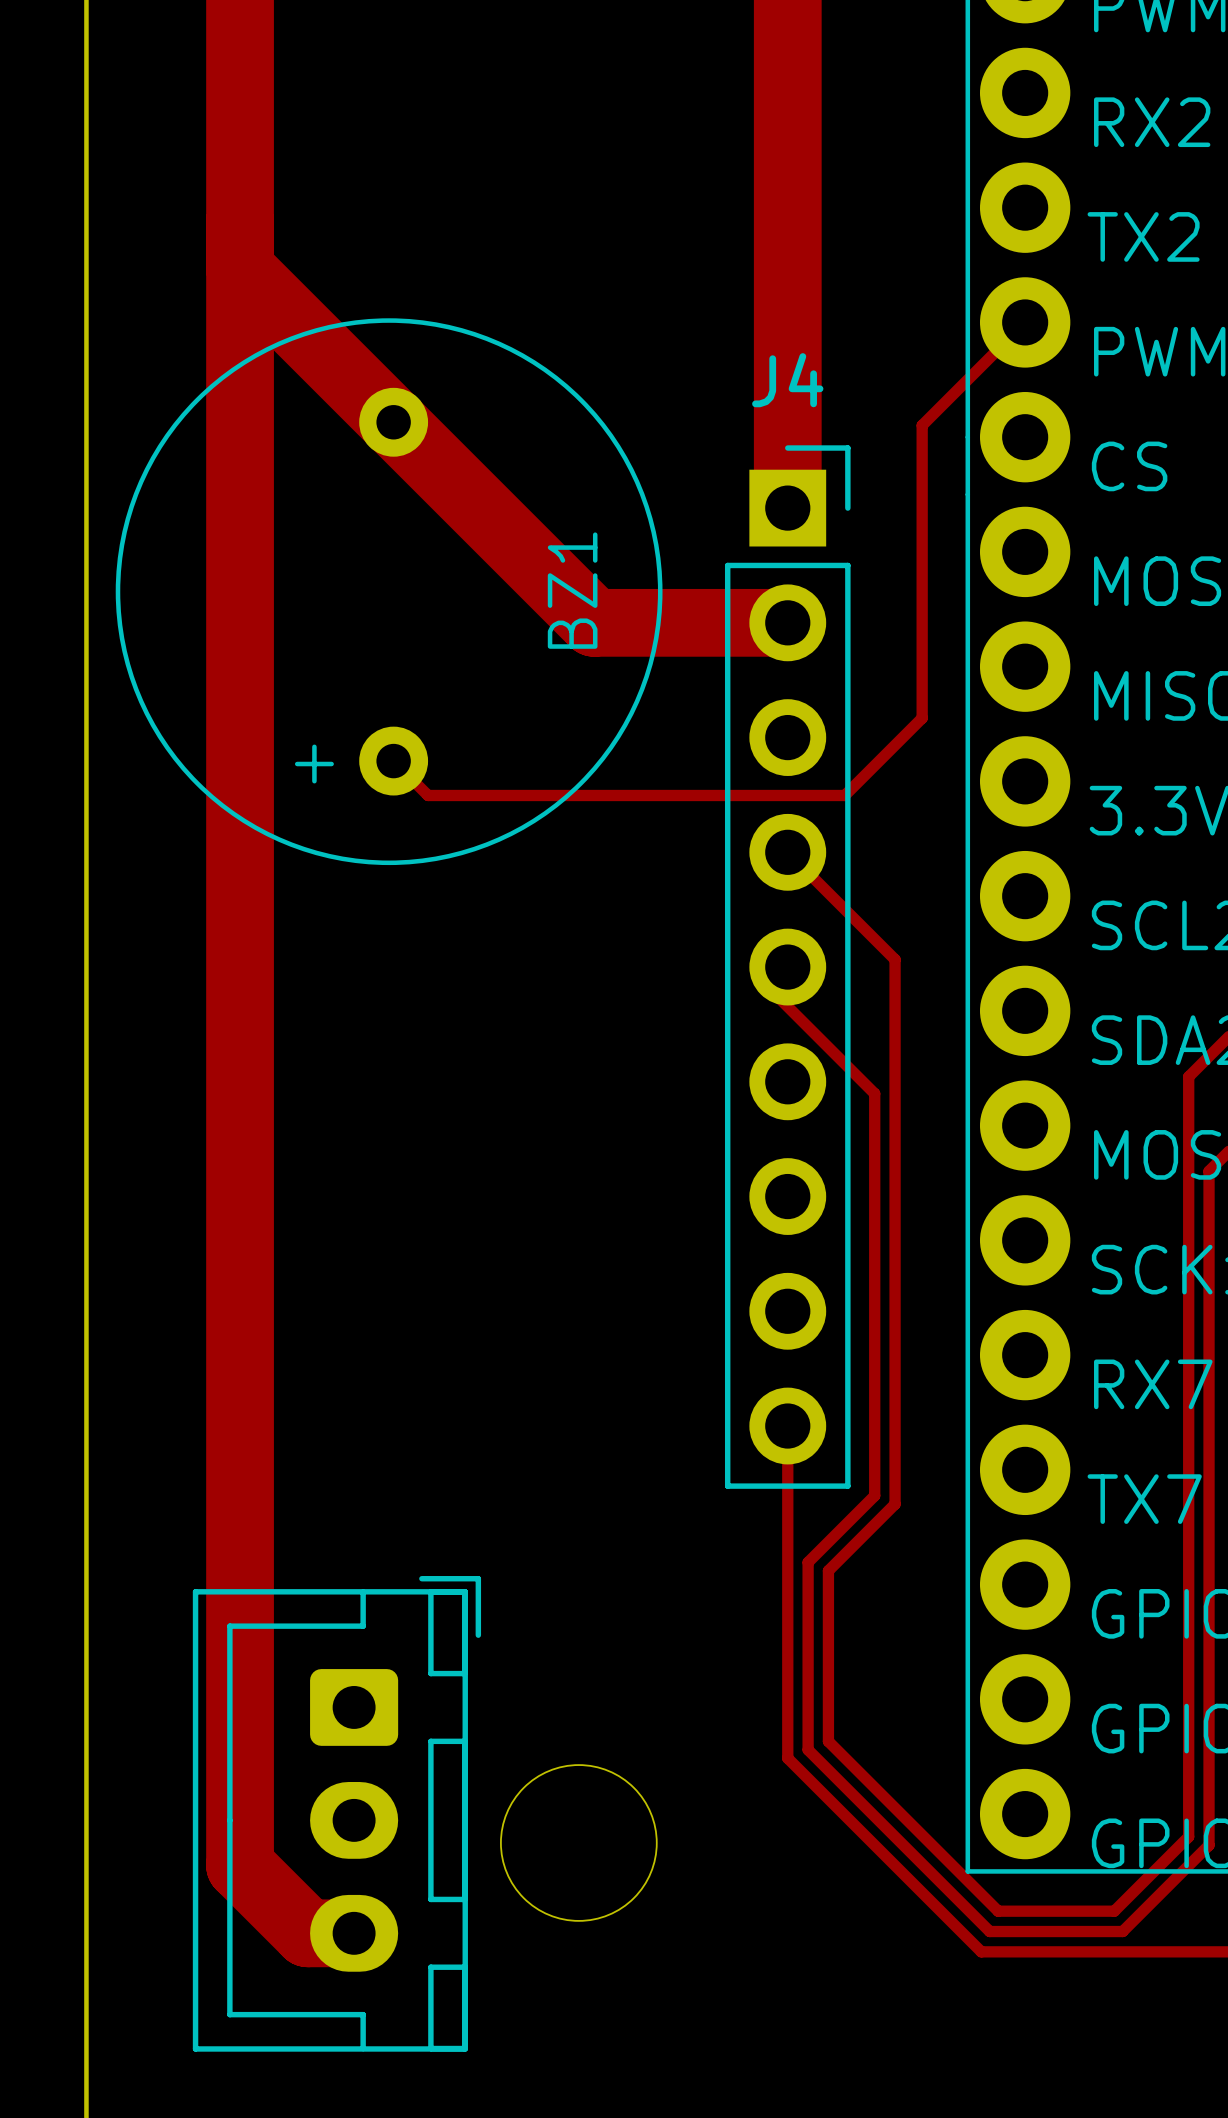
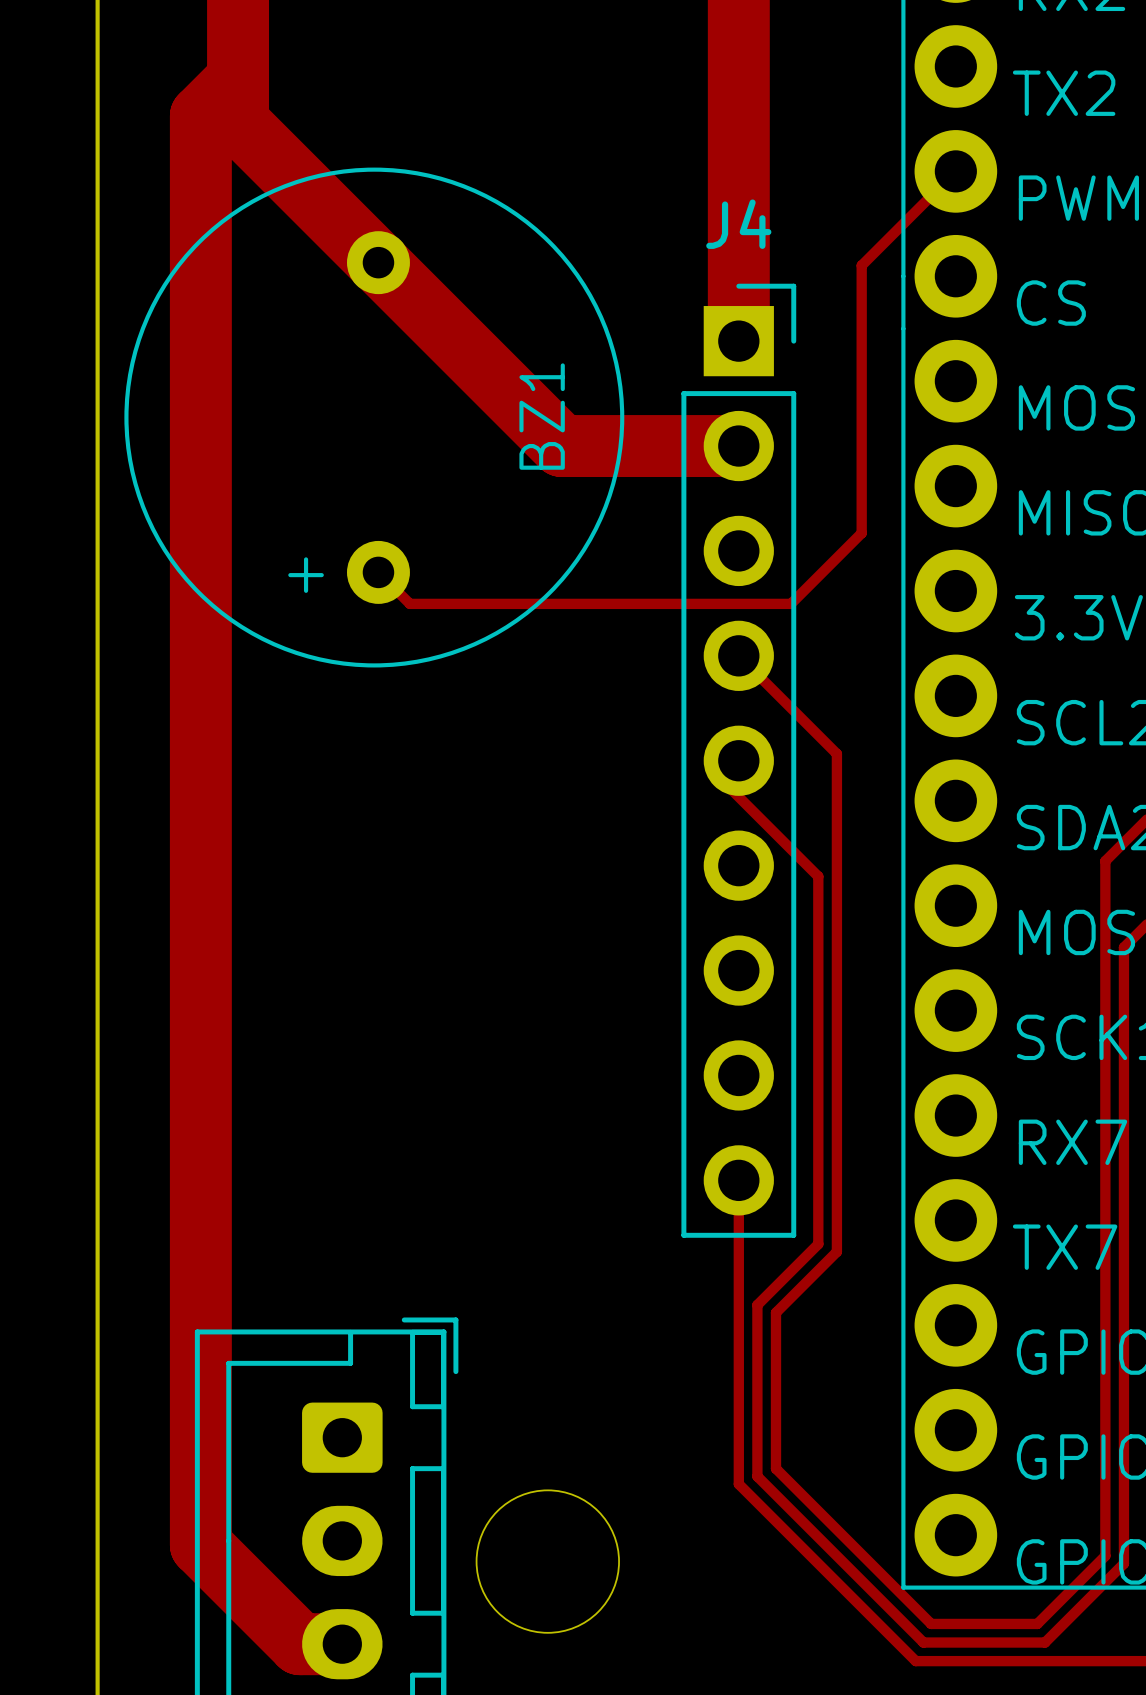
track: (240, 268) (240, 1865) -> (238, 78) (200, 116) (200, 1545) (238, 1582)

